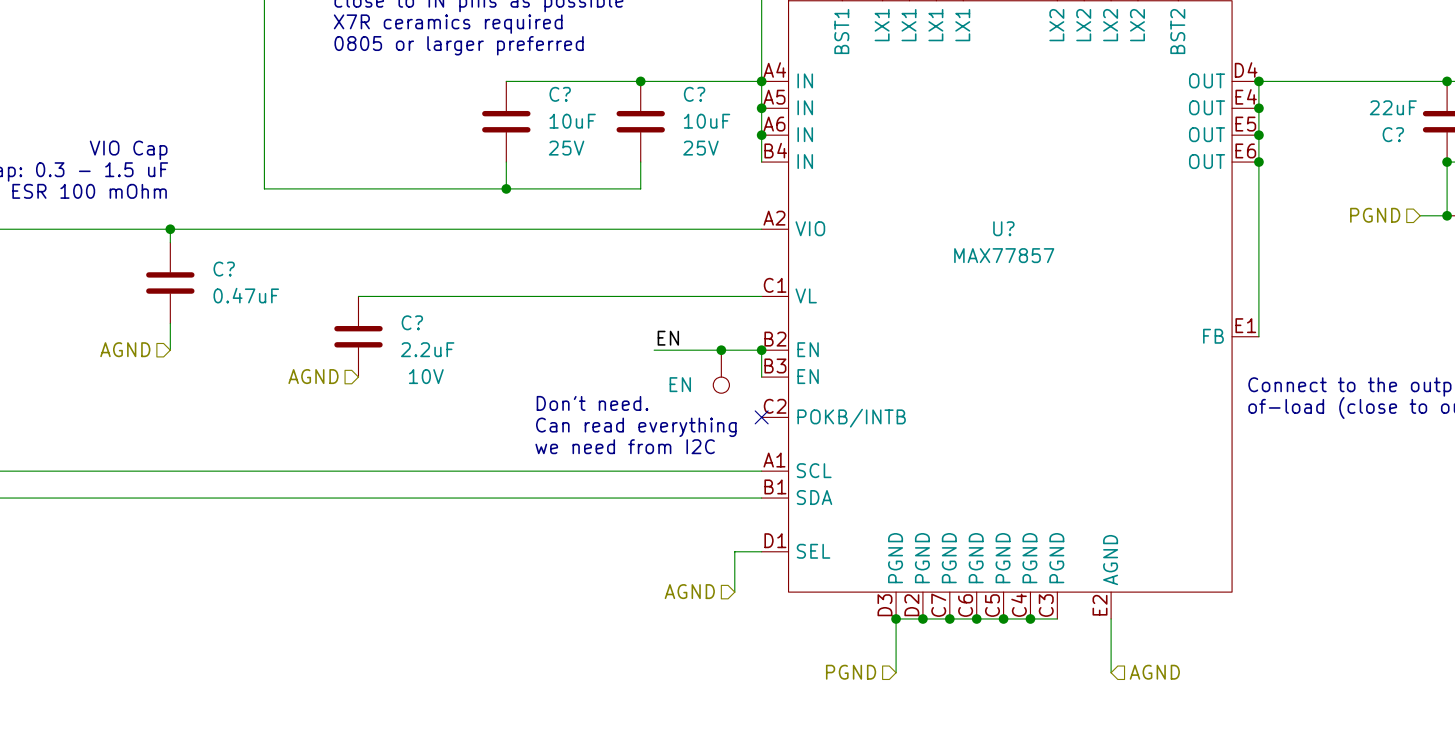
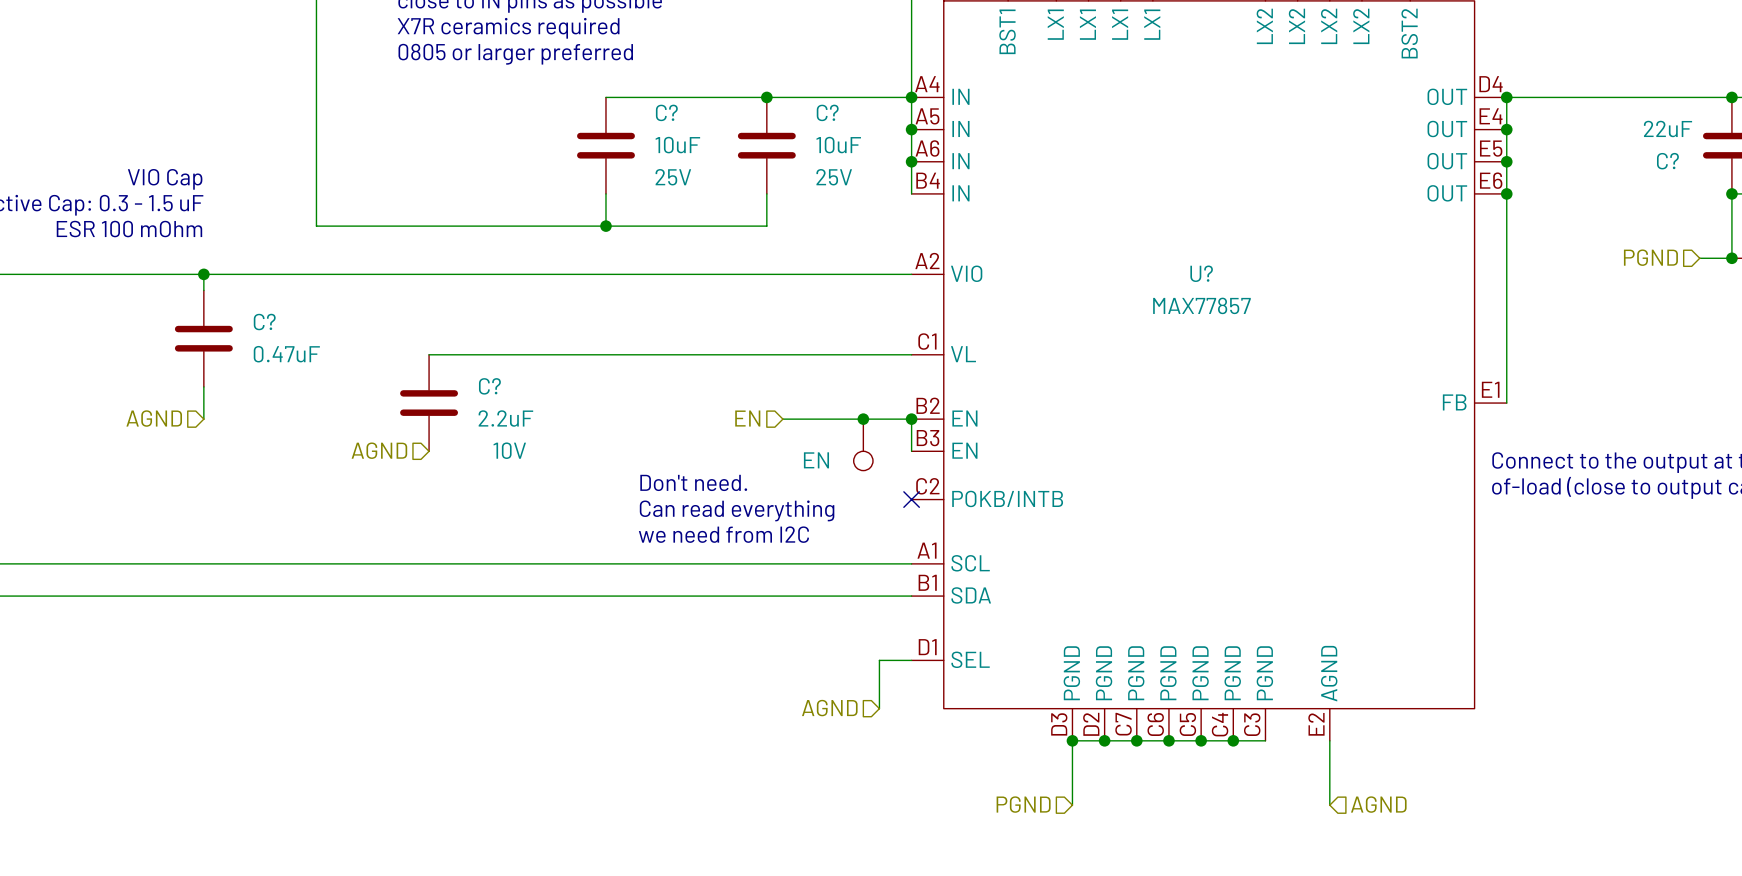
label: EN (668, 338) -> none
hierarchical label: none -> EN (747, 418)

